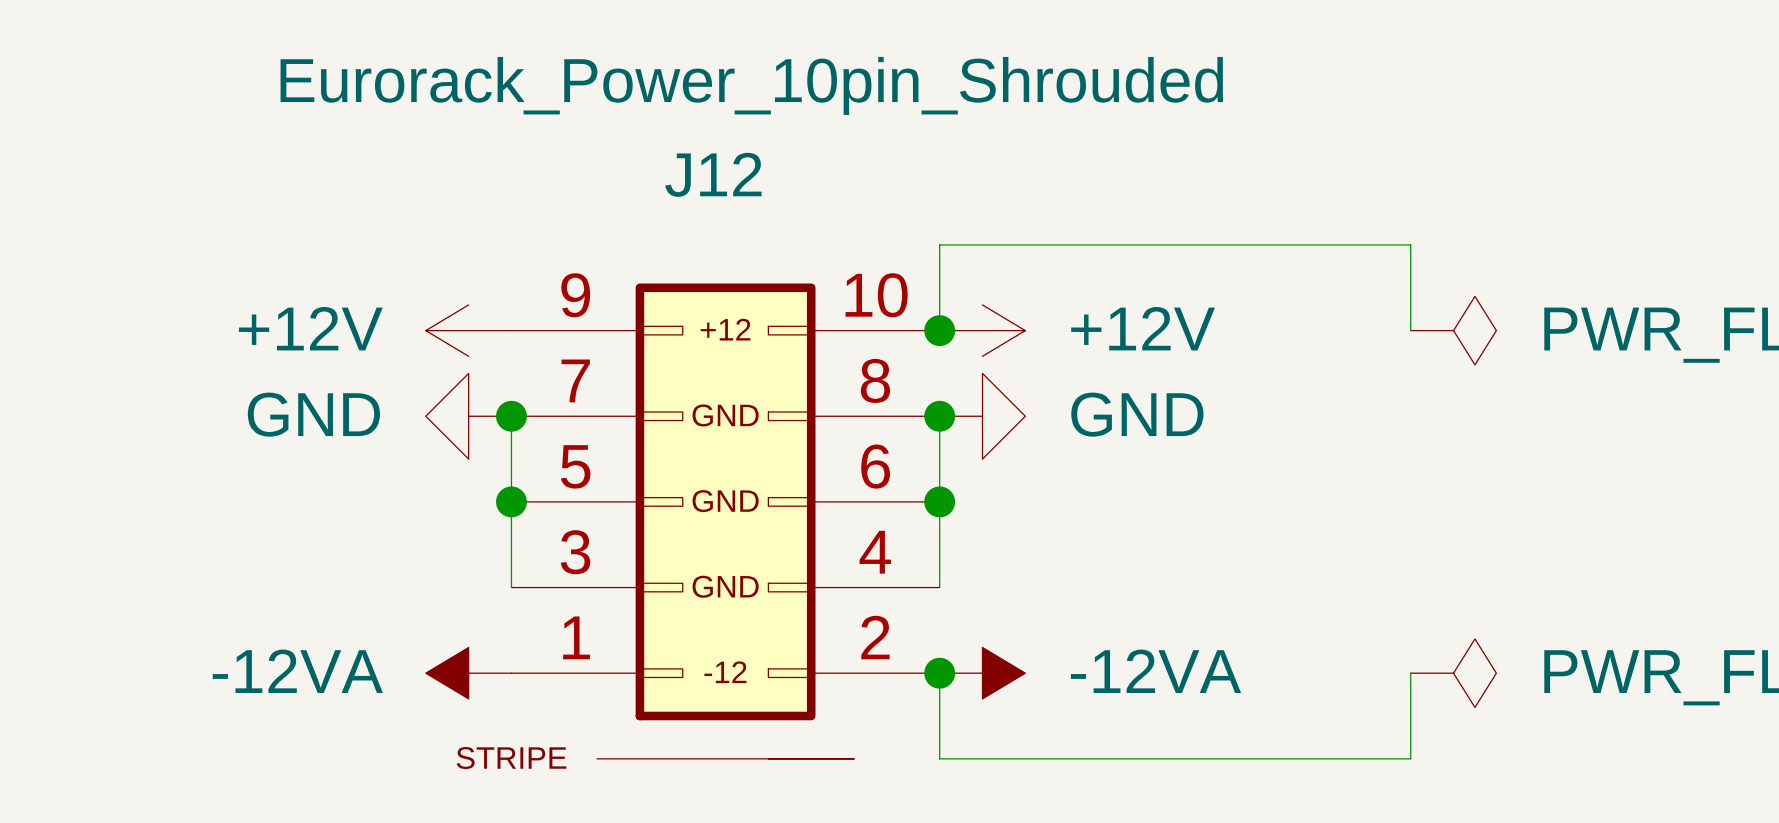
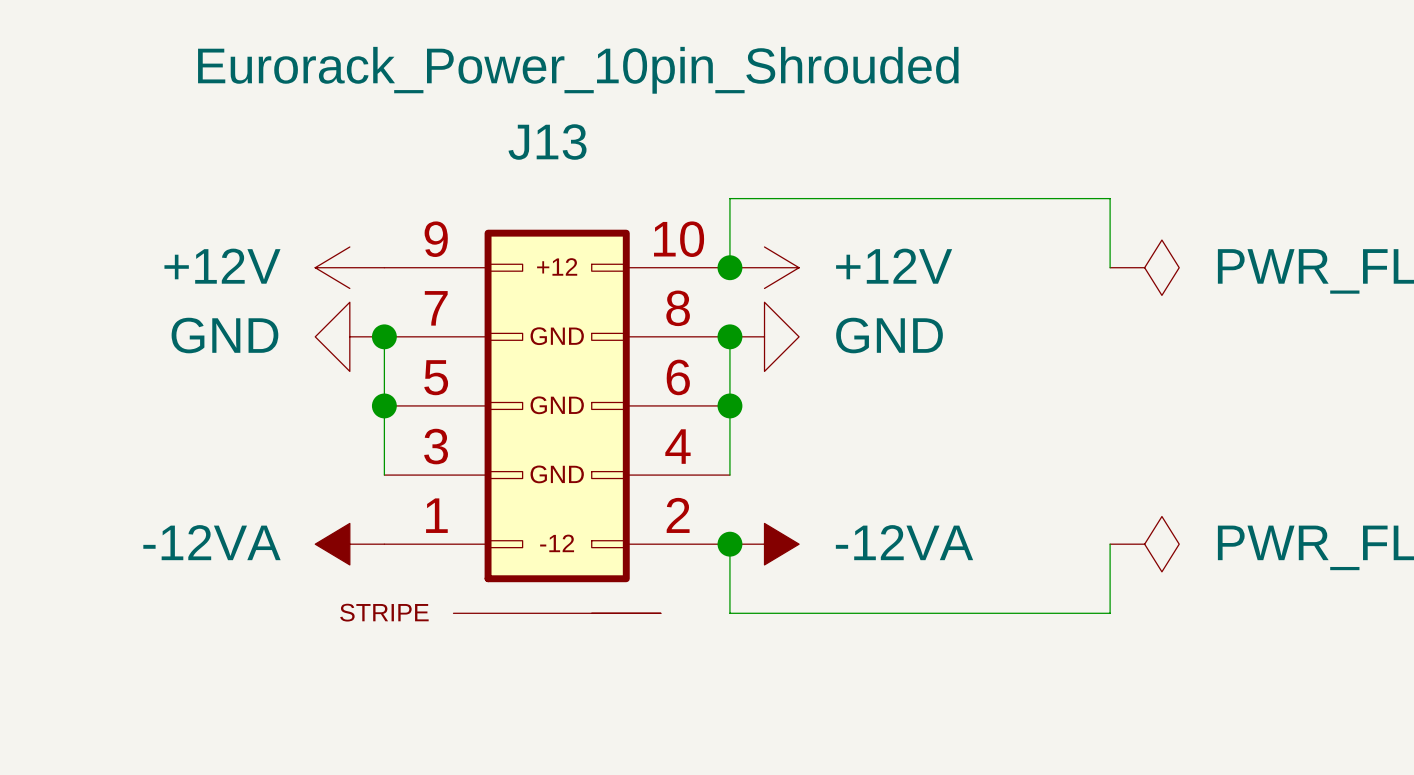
J12 name: J12 (713, 174) -> J13 (547, 142)

